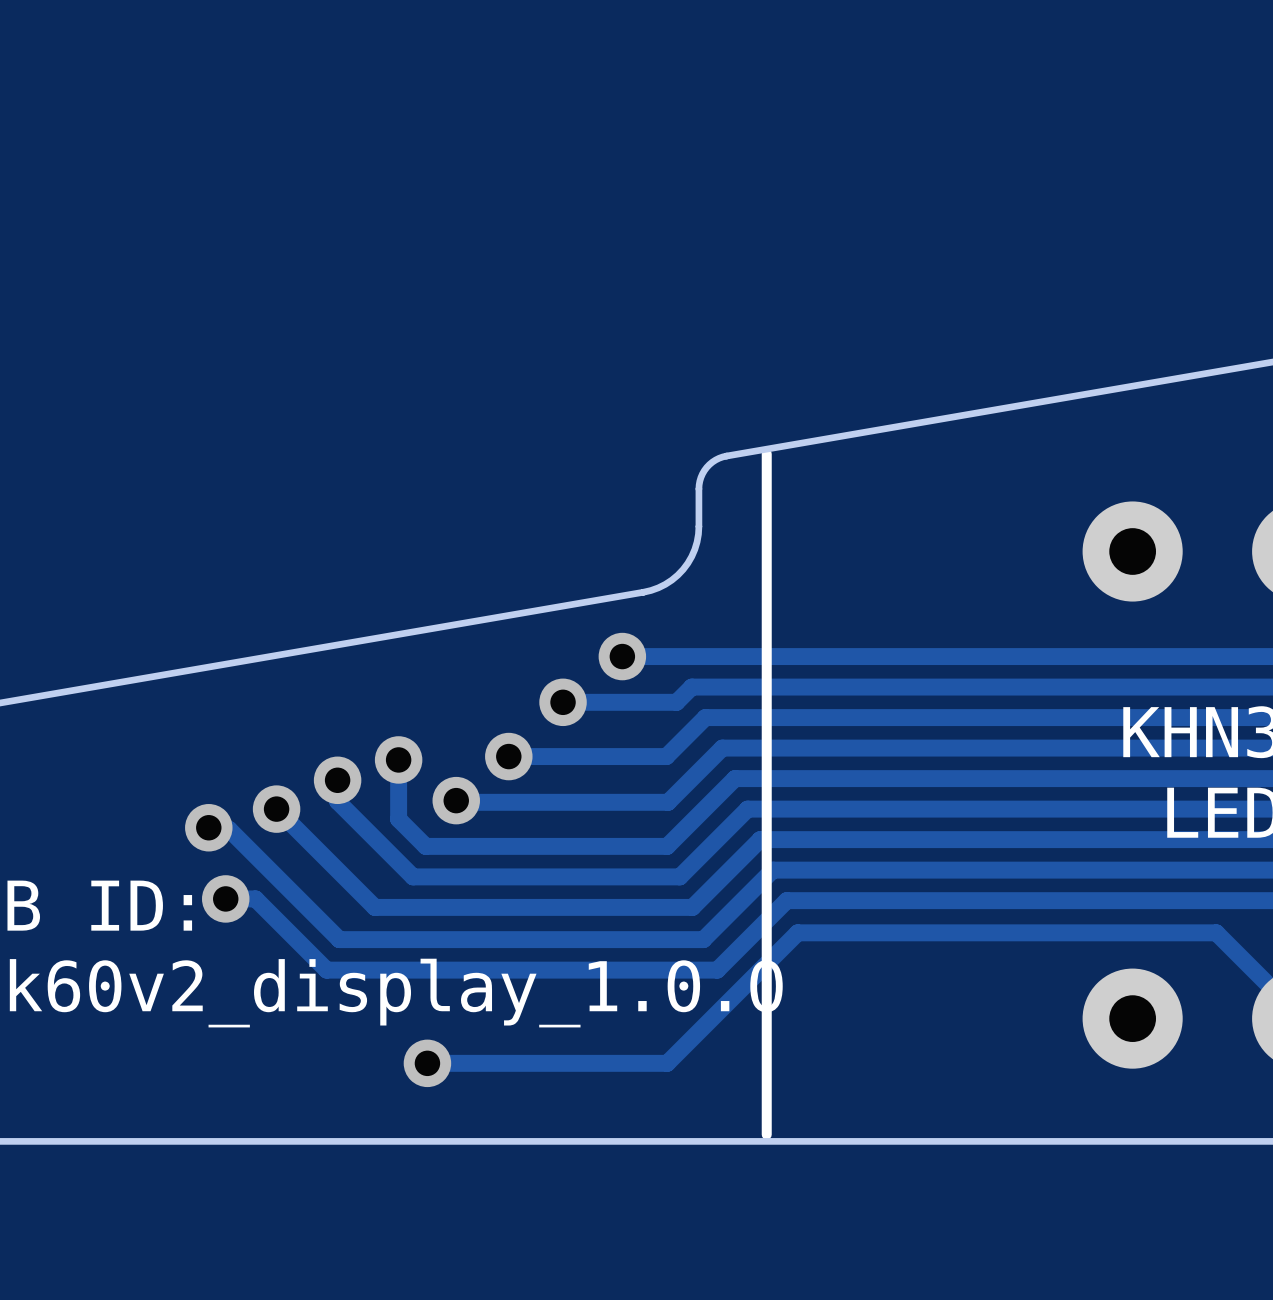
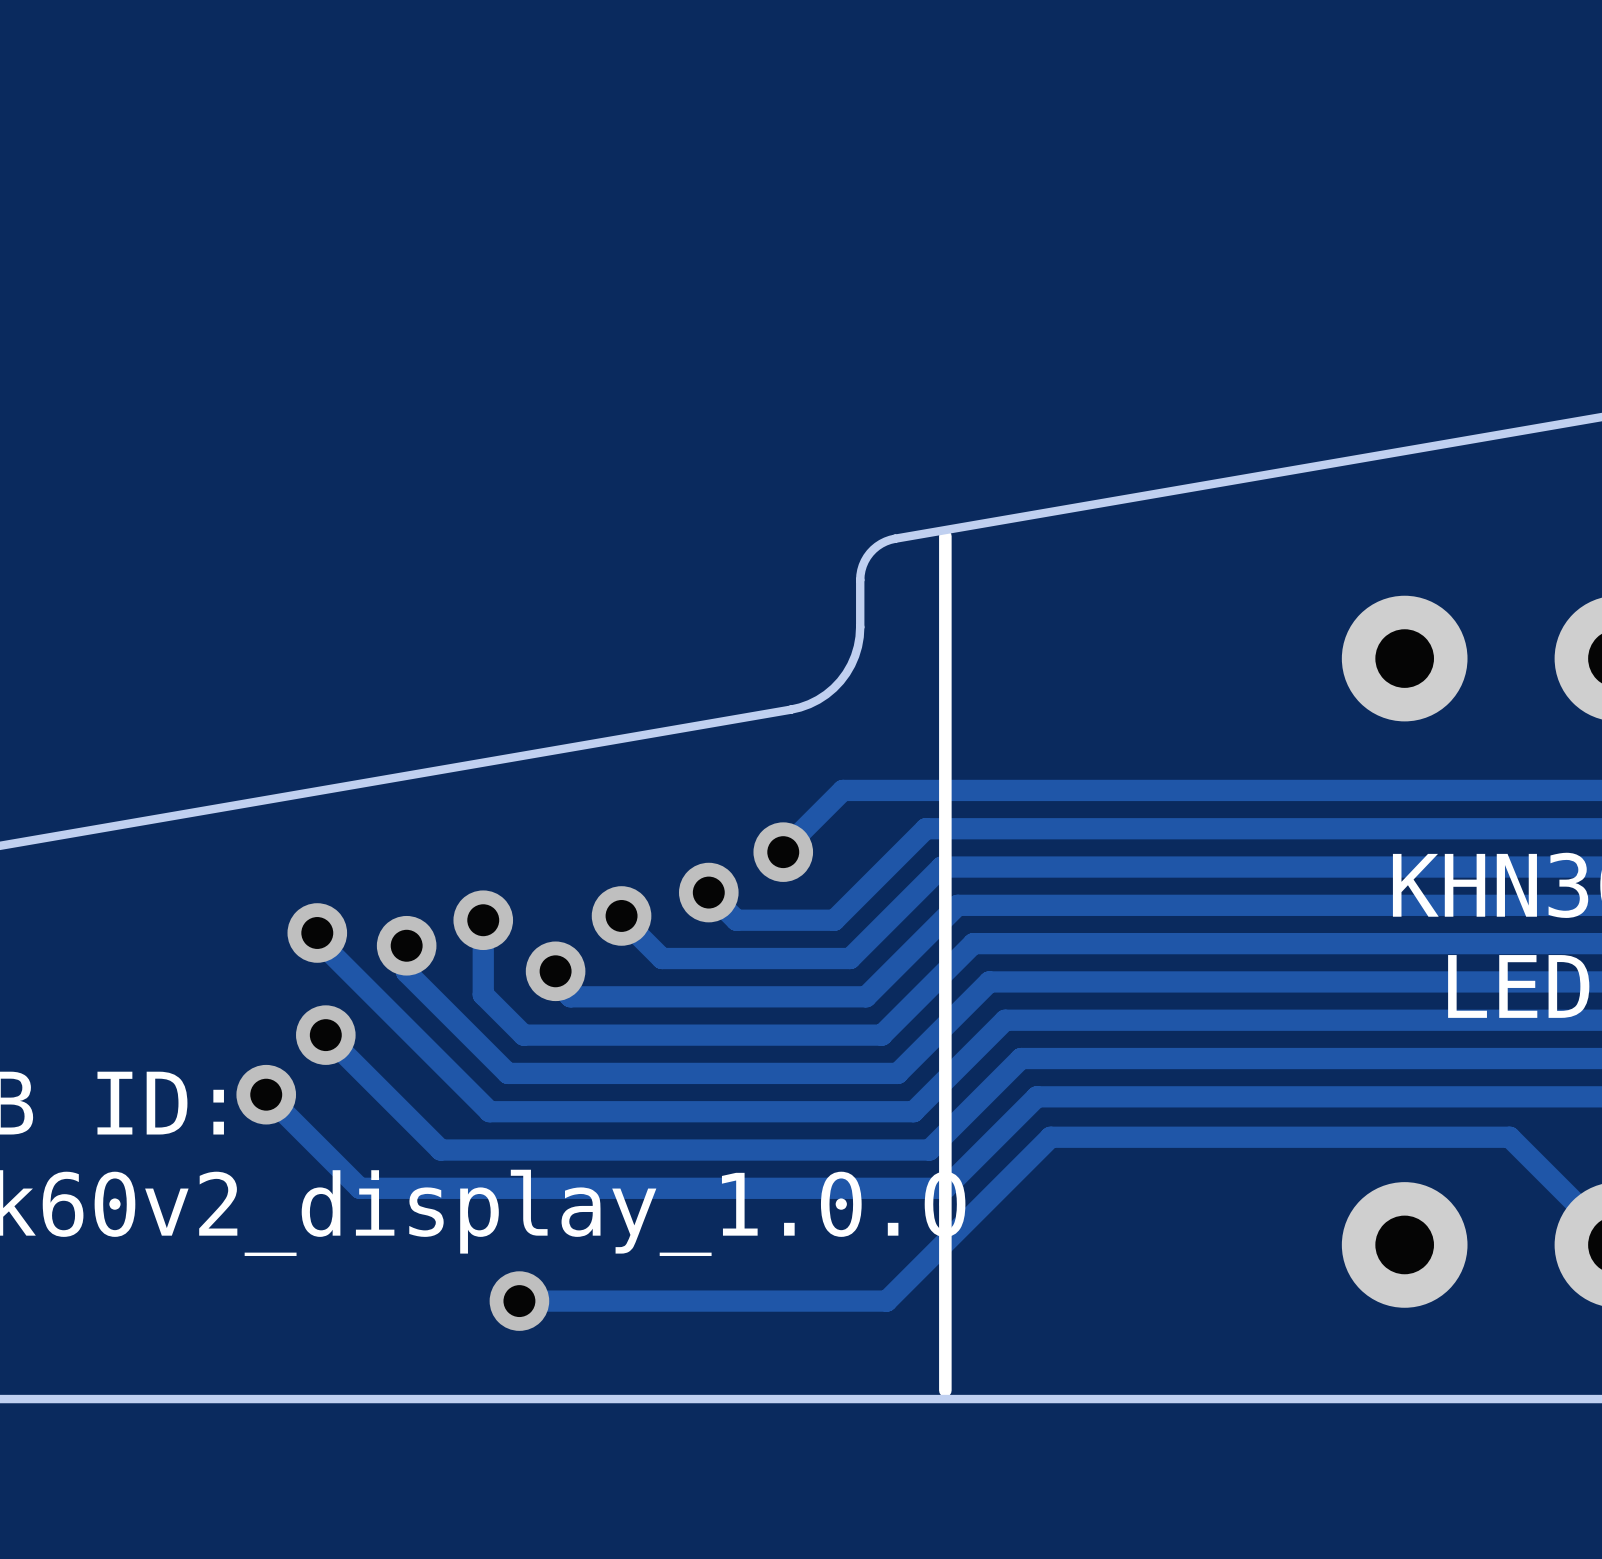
track: (622, 656) (685, 656) -> (783, 850) (842, 790)
via: (622, 656) -> none
track: (751, 687) (691, 687) (676, 702) (563, 702) -> (925, 828) (834, 920) (736, 920) (708, 892)
via position: (563, 702) -> (708, 892)
via: none -> (783, 852)
track: (763, 717) (705, 717) (666, 756) (507, 756) -> (941, 867) (850, 958) (661, 958) (619, 915)
track: (776, 748) (722, 748) (668, 802) (449, 802) -> (957, 905) (866, 996) (570, 996) (547, 973)
via: none -> (317, 932)
track: (789, 778) (735, 778) (667, 846) (425, 846) -> (973, 943) (881, 1035) (523, 1035) (517, 1028)
track: (276, 809) (374, 907) (692, 907) (760, 839) (814, 839) -> (317, 939) (489, 1111) (913, 1111) (1005, 1020)
via: (276, 809) -> none
track: (801, 809) (747, 809) (679, 876) (413, 876) -> (989, 981) (897, 1073) (507, 1073) (501, 1067)
via: (208, 827) -> none
track: (207, 829) (229, 829) (339, 939) (703, 939) (772, 870) (827, 870) -> (325, 1035) (440, 1150) (929, 1150) (1021, 1058)
via: none -> (325, 1035)
track: (225, 898) (255, 898) (326, 970) (717, 970) (786, 900) (839, 900) -> (266, 1094) (359, 1188) (945, 1188) (1036, 1096)
track: (850, 932) (797, 932) (667, 1063) -> (1050, 1137) (886, 1301) (820, 1301)

